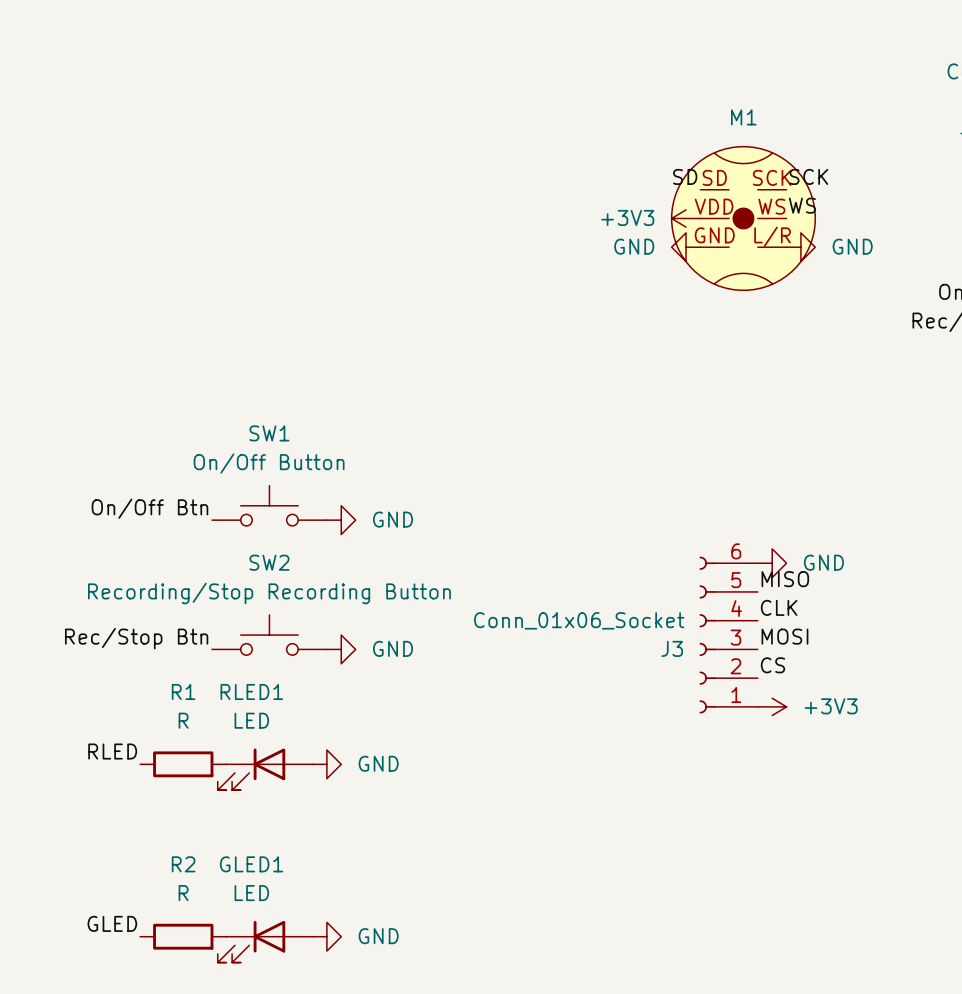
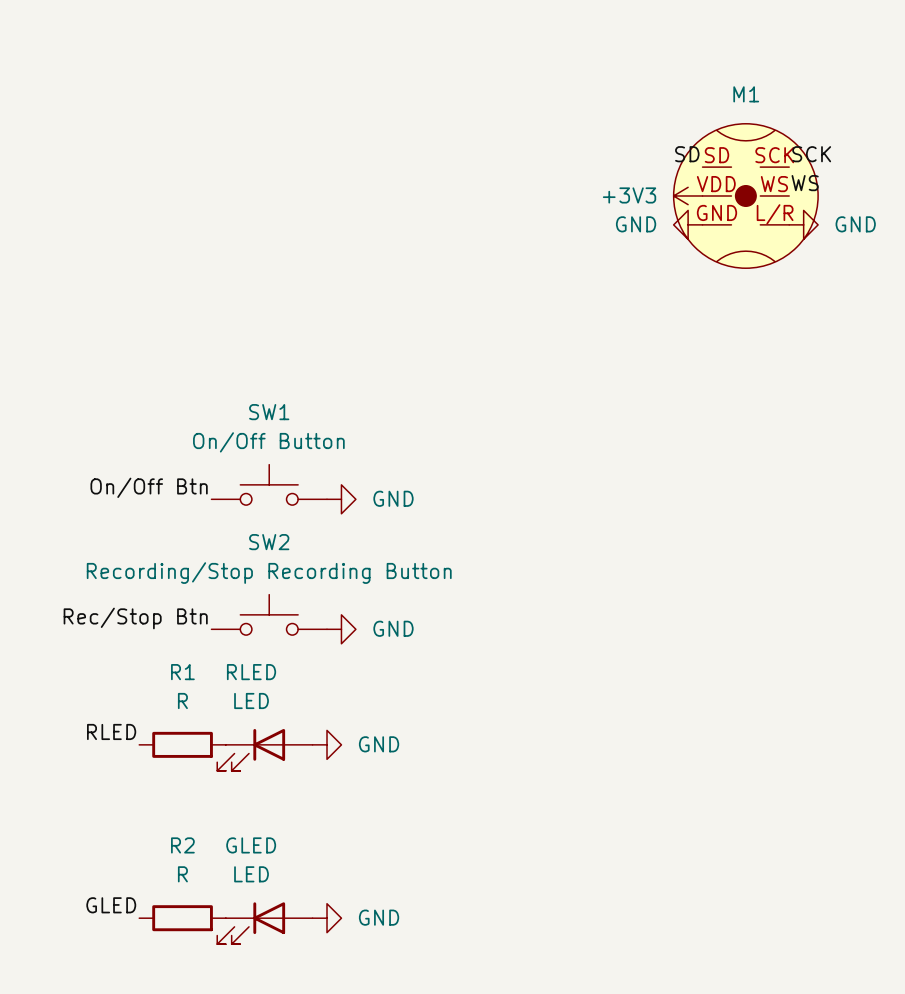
power symbol: GND (772, 563) -> none
label: MISO (785, 579) -> none
label: CLK (779, 607) -> none
J3: Conn_01x06_Socket (728, 635) -> none
label: MOSI (784, 636) -> none
label: CS (772, 665) -> none
RLED1 name: RLED1 (251, 691) -> RLED (251, 672)
power symbol: +3V3 (772, 706) -> none
GLED1 name: GLED1 (251, 864) -> GLED (251, 845)

